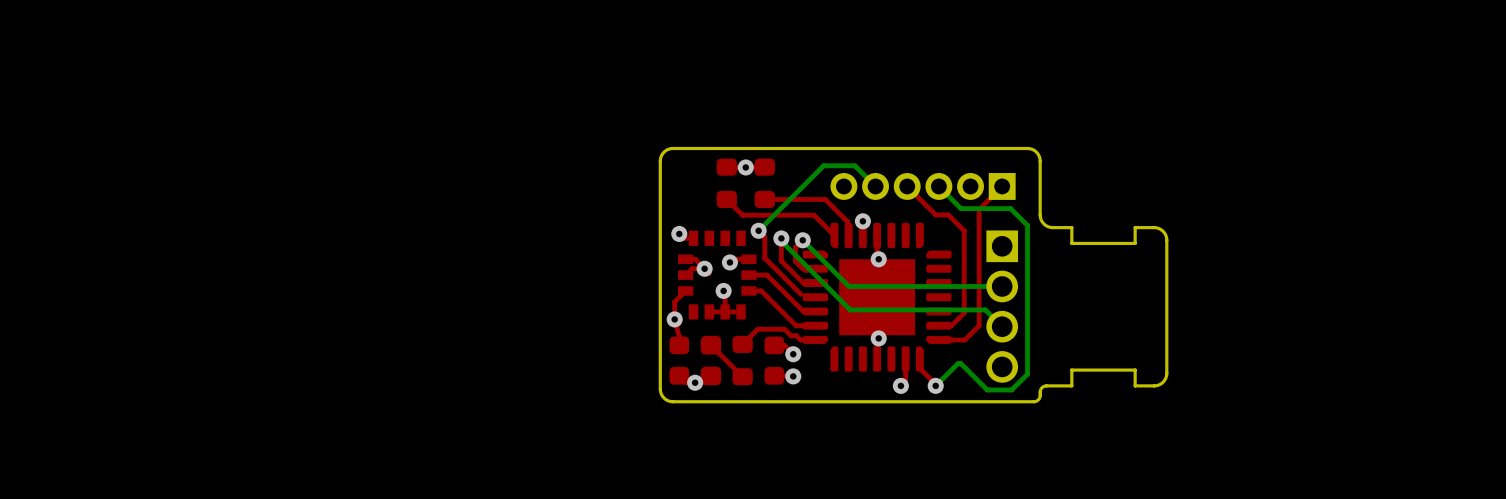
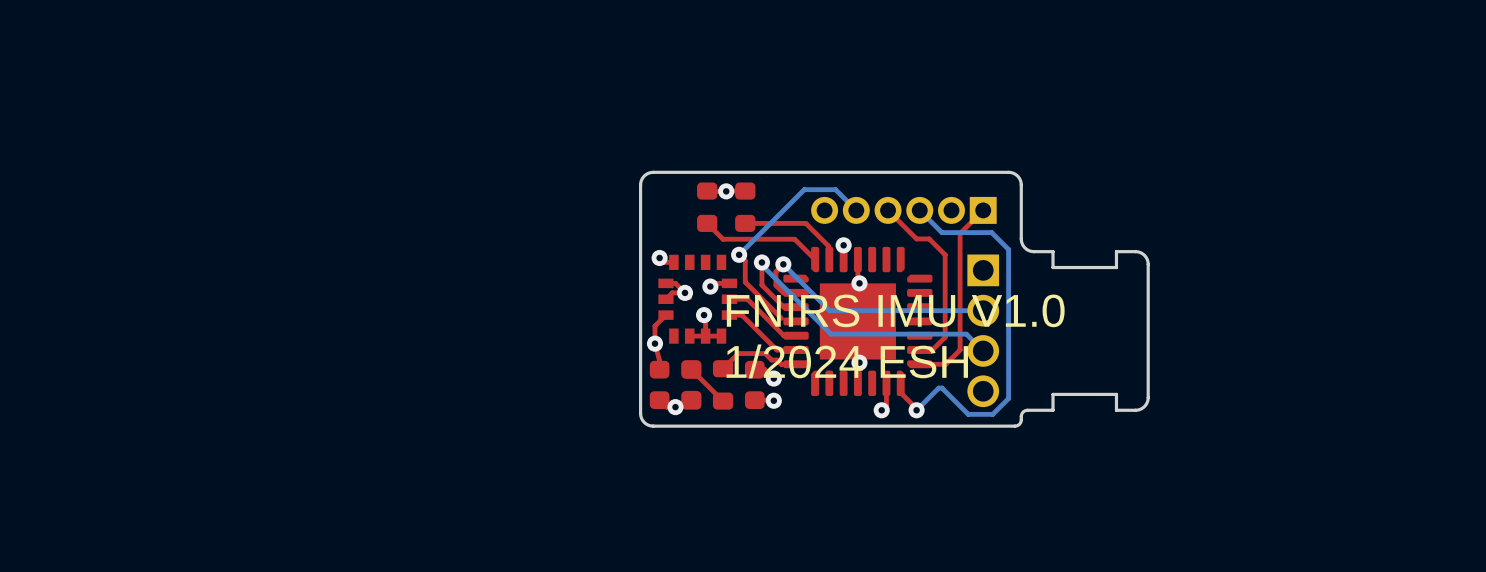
text: none -> FNIRS IMU V1.0 (895, 310)
text: none -> 1/2024 ESH (847, 361)

